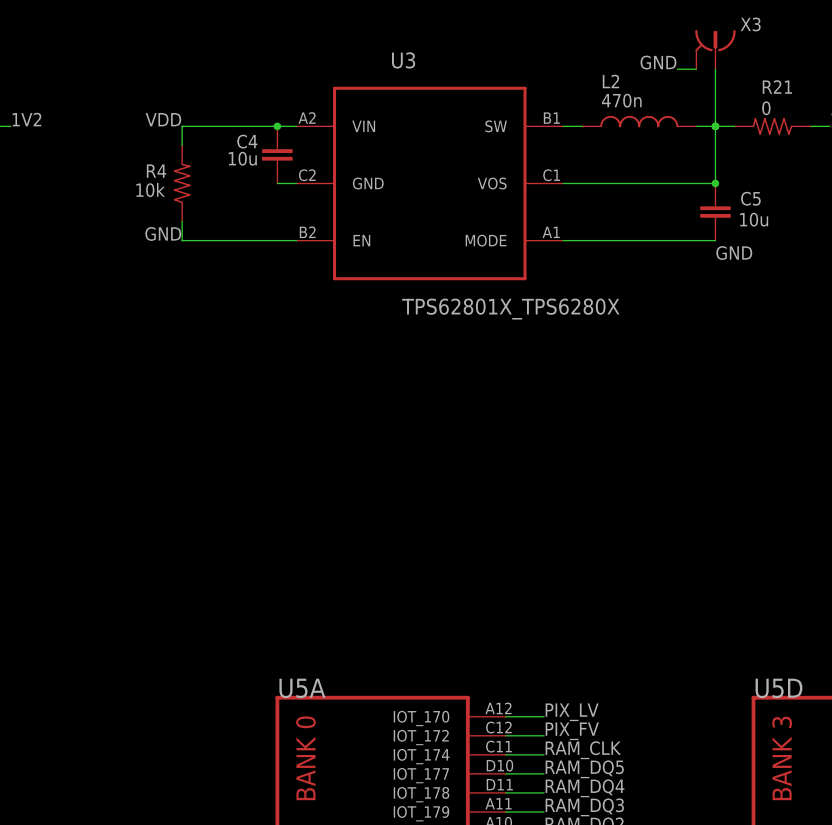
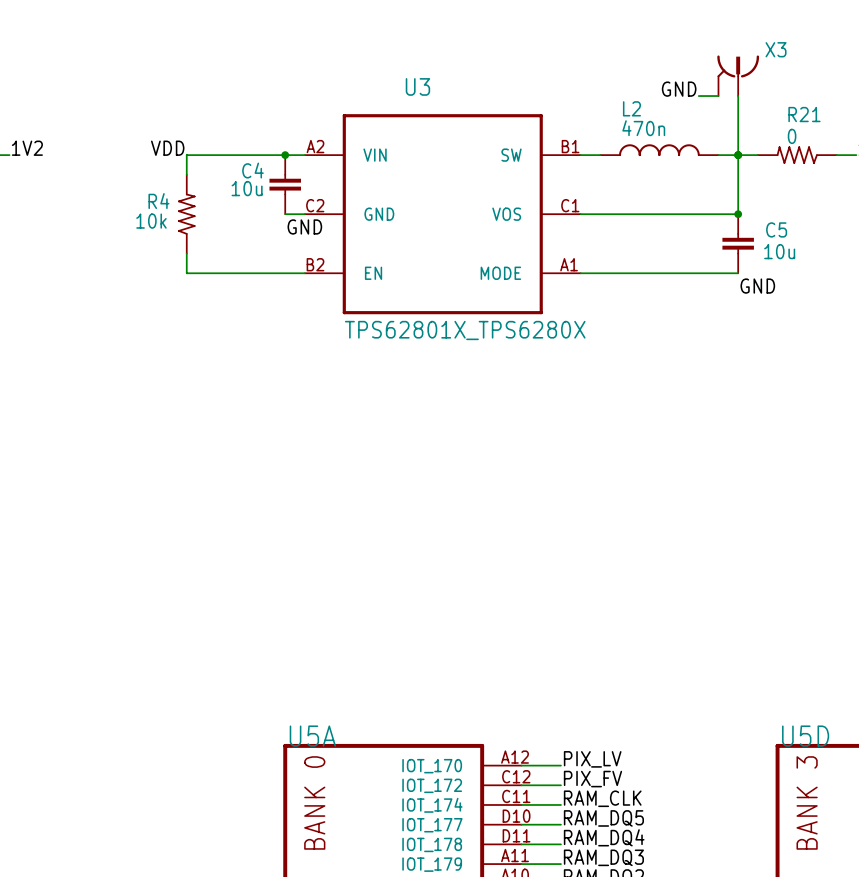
label position: GND (163, 233) -> GND (304, 226)
U3 value position: TPS62801X_TPS6280X (510, 309) -> TPS62801X_TPS6280X (465, 330)

